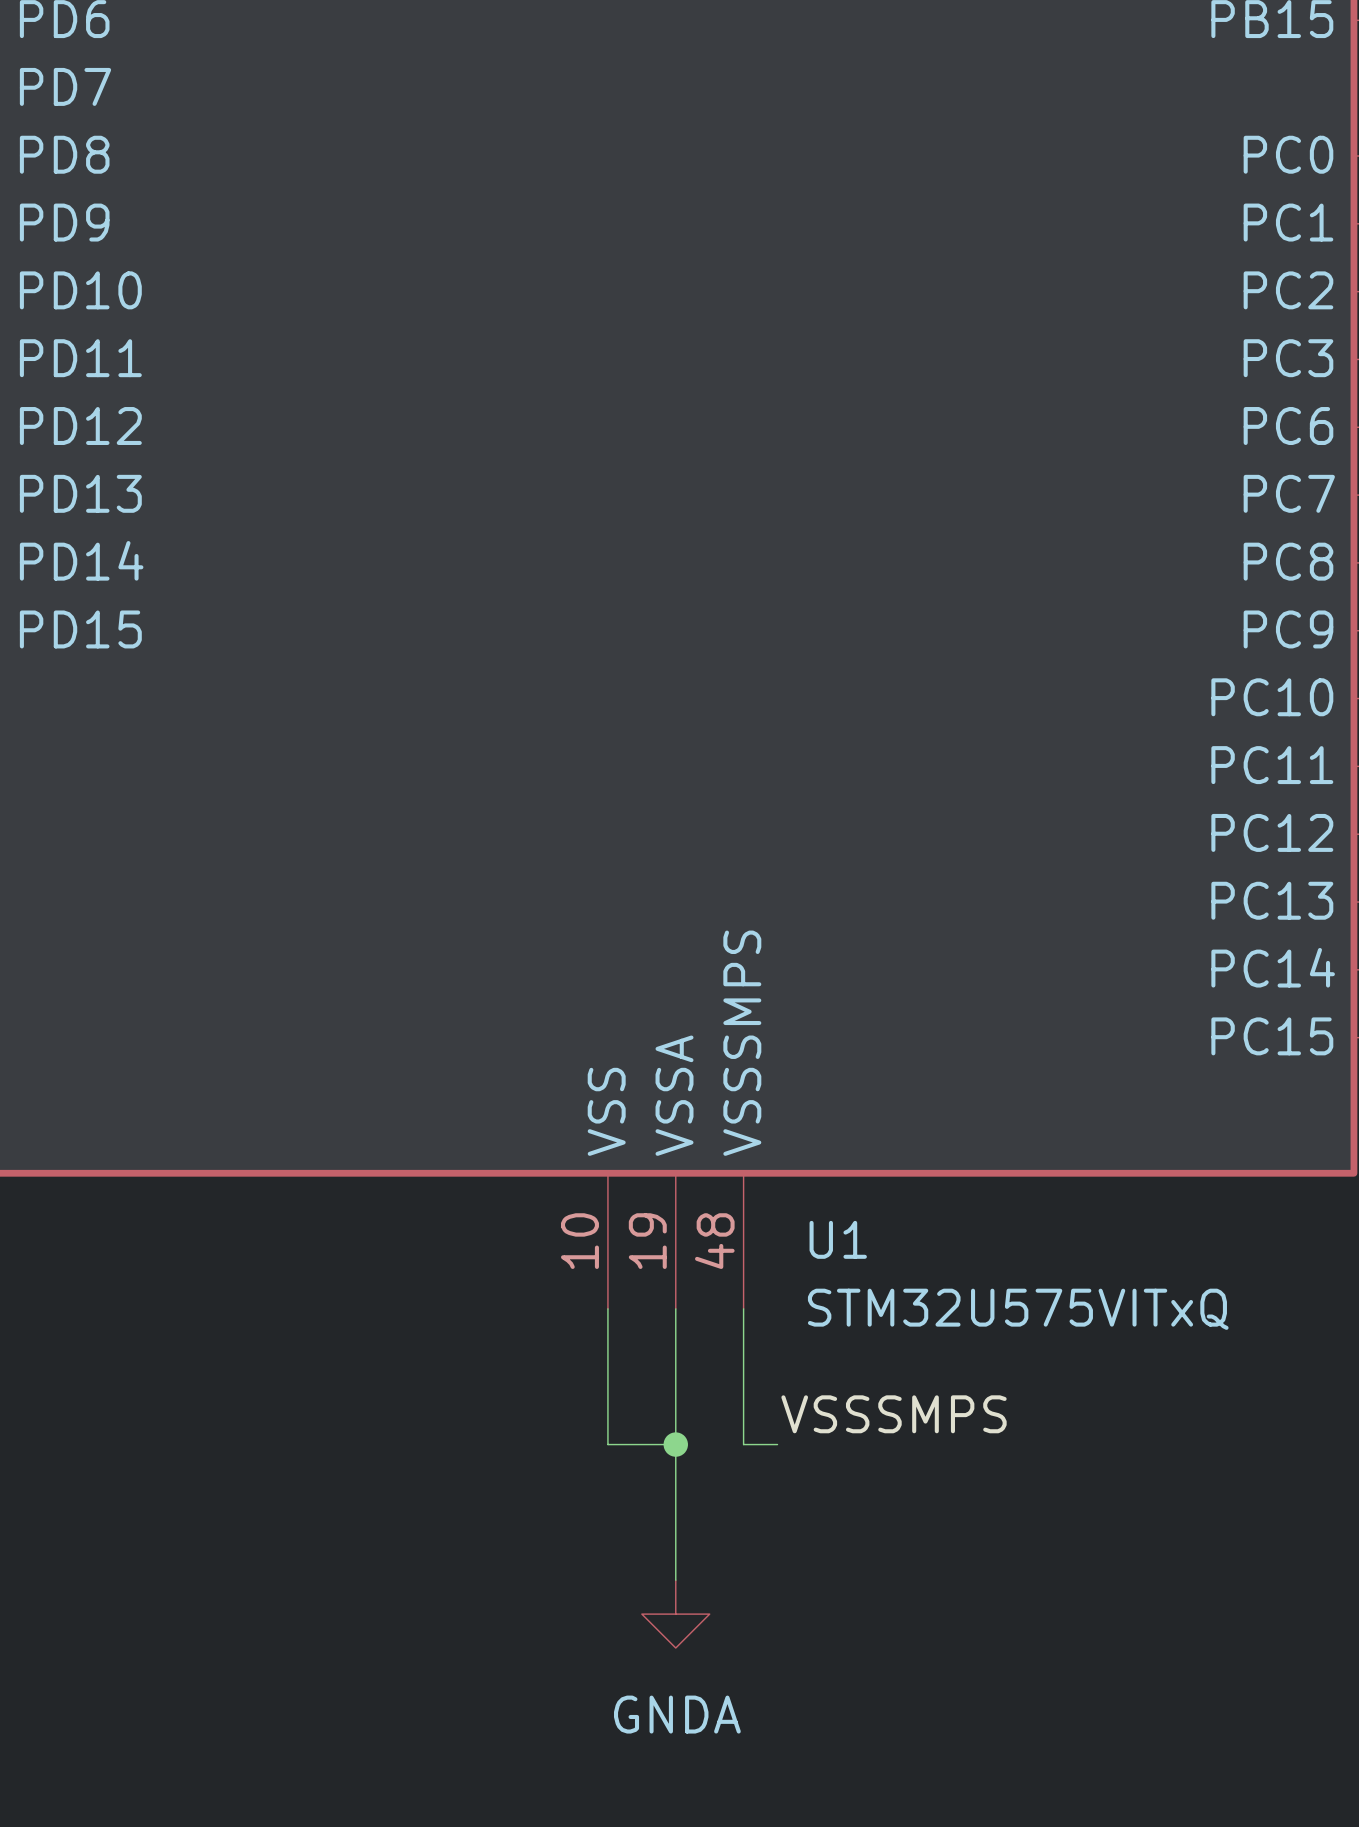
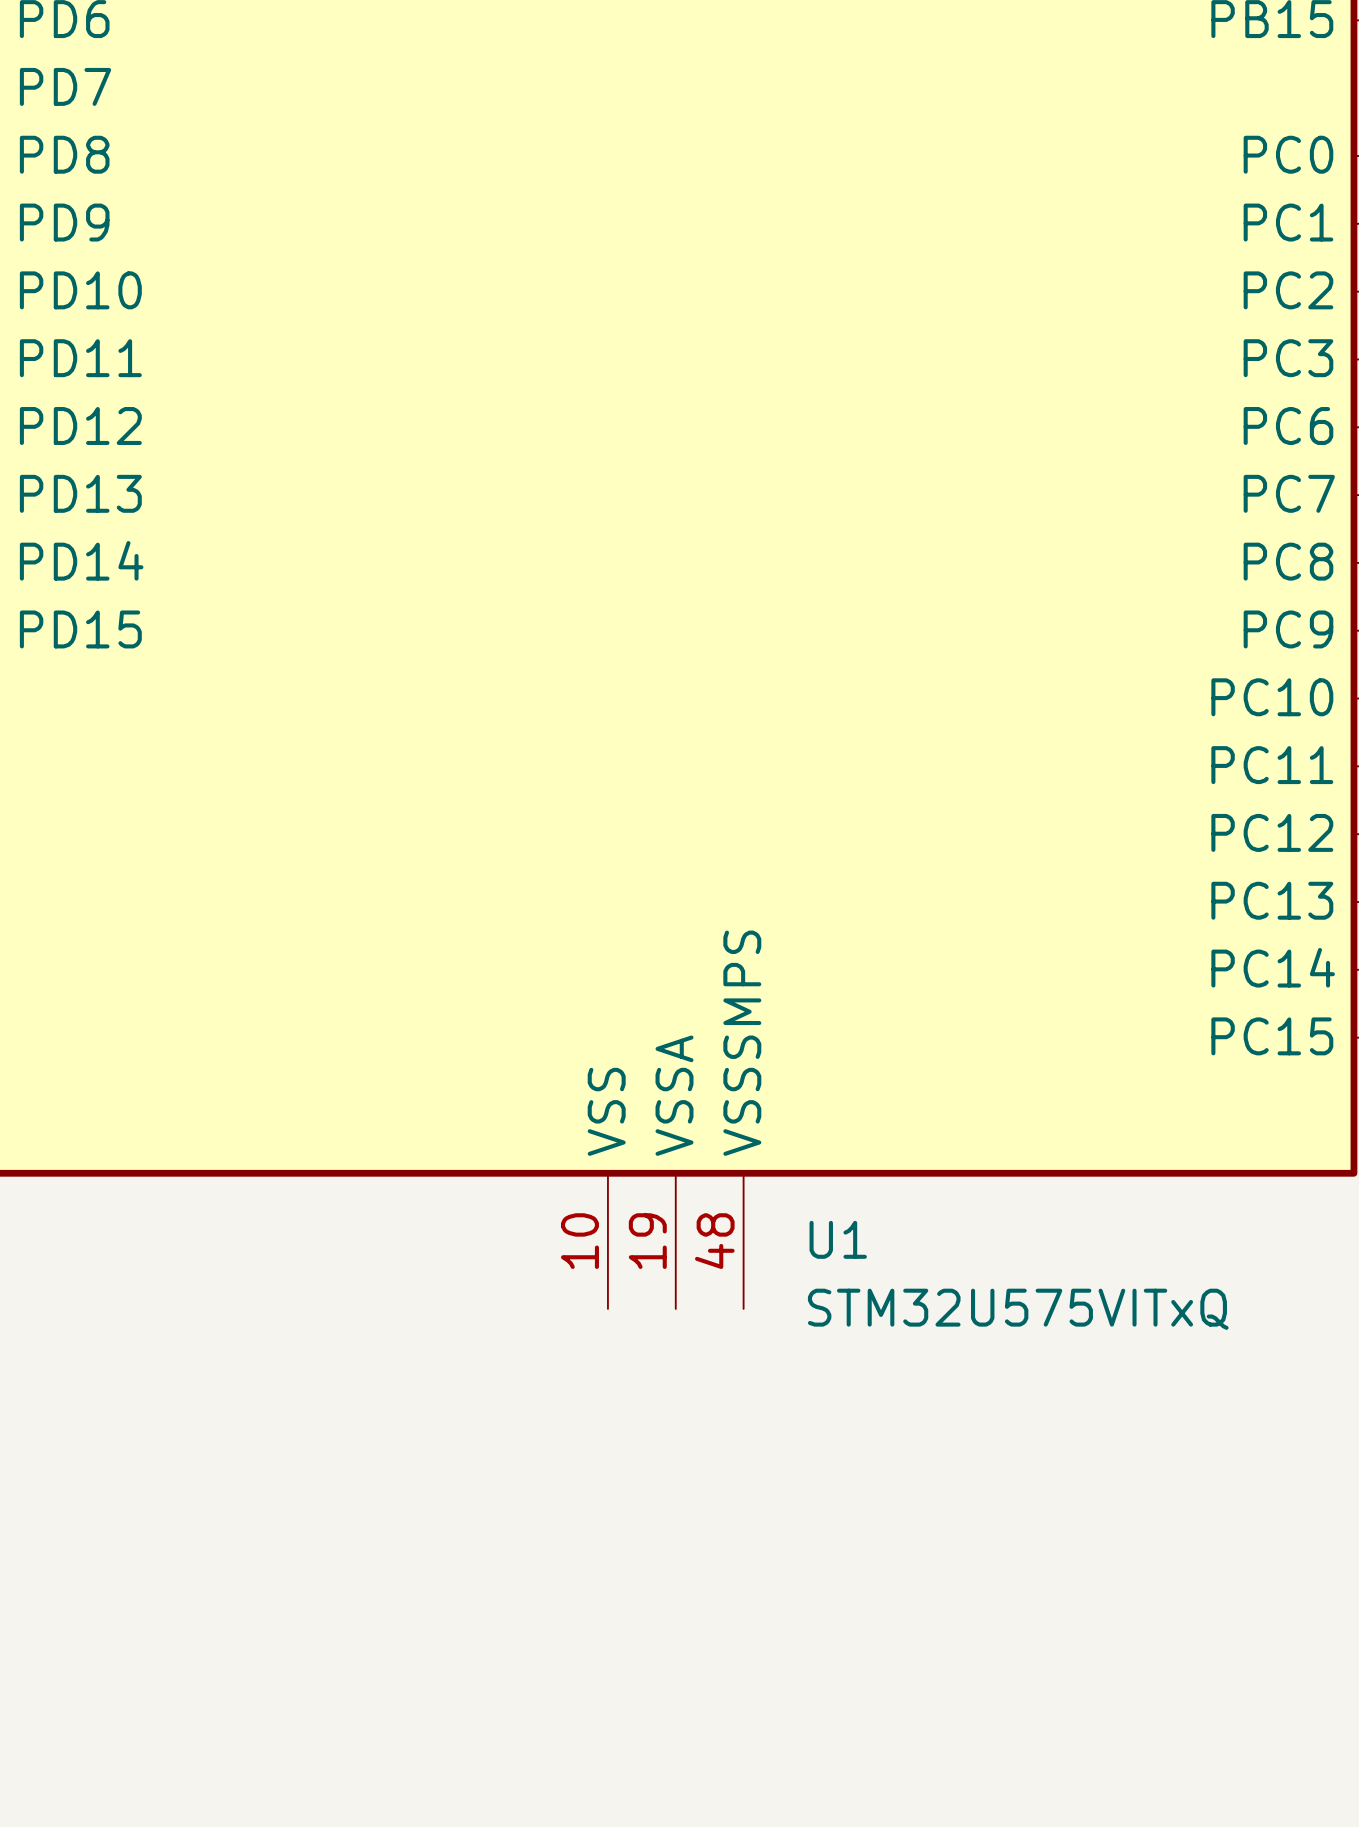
wire: (607, 1308) (607, 1444) (675, 1444) -> none
wire: (675, 1308) (675, 1580) -> none
wire: (743, 1308) (743, 1444) (777, 1444) -> none
label: VSSSMPS (894, 1414) -> none
junction: (675, 1444) -> none
power symbol: GNDA (675, 1614) -> none

